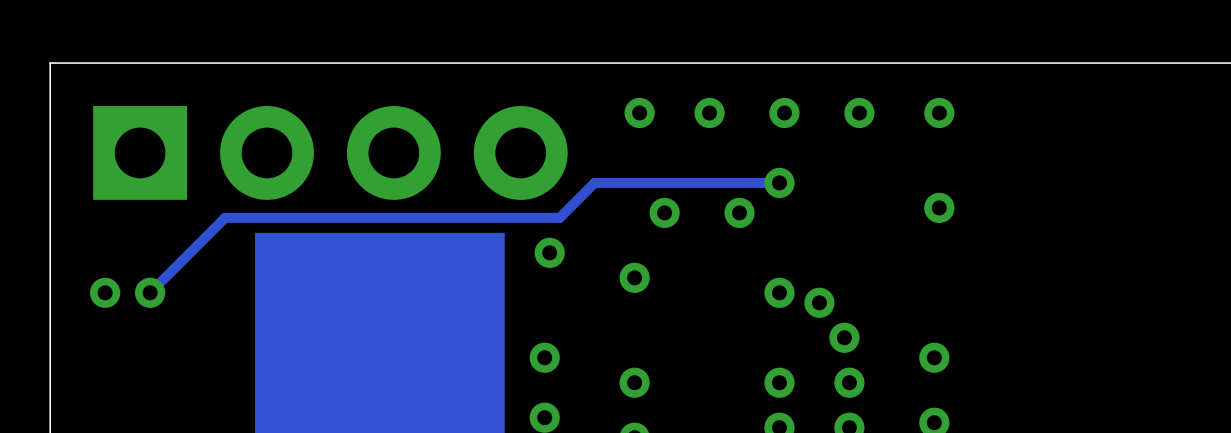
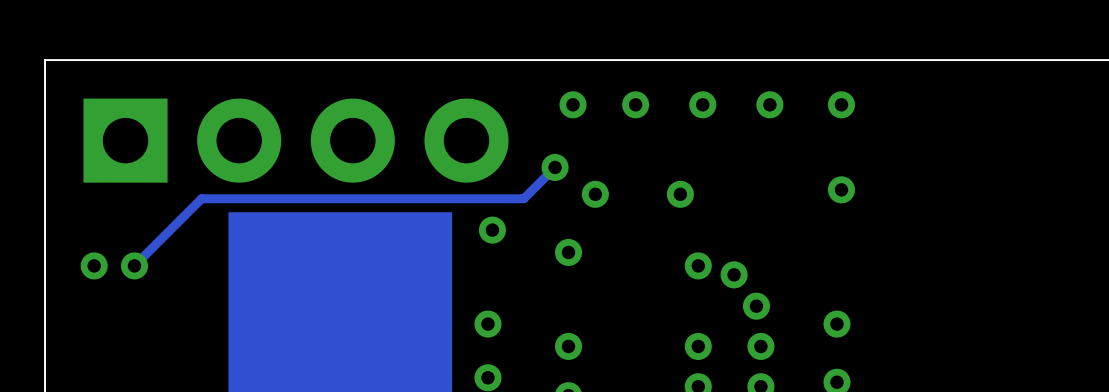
via: none -> (555, 167)
track: (779, 182) (594, 182) (559, 217) -> (555, 167) (523, 198) (501, 198)
via: (779, 182) -> none
via: (739, 212) -> none
via: none -> (680, 194)

